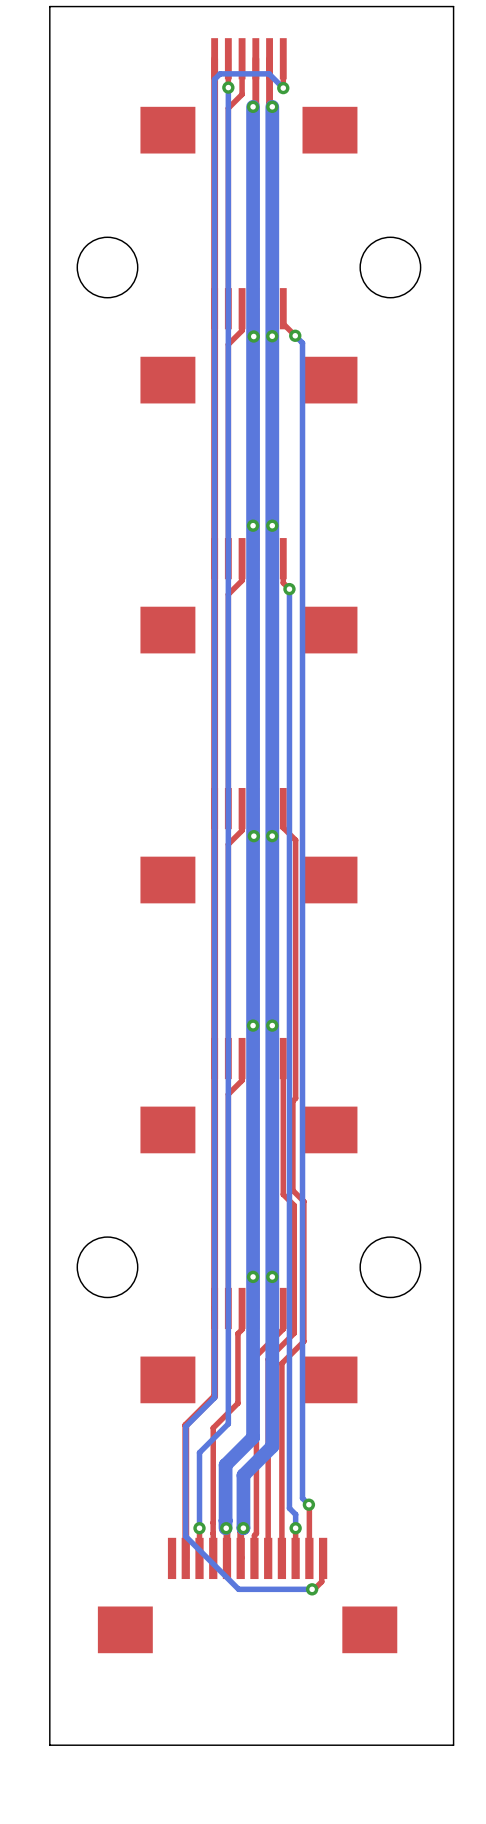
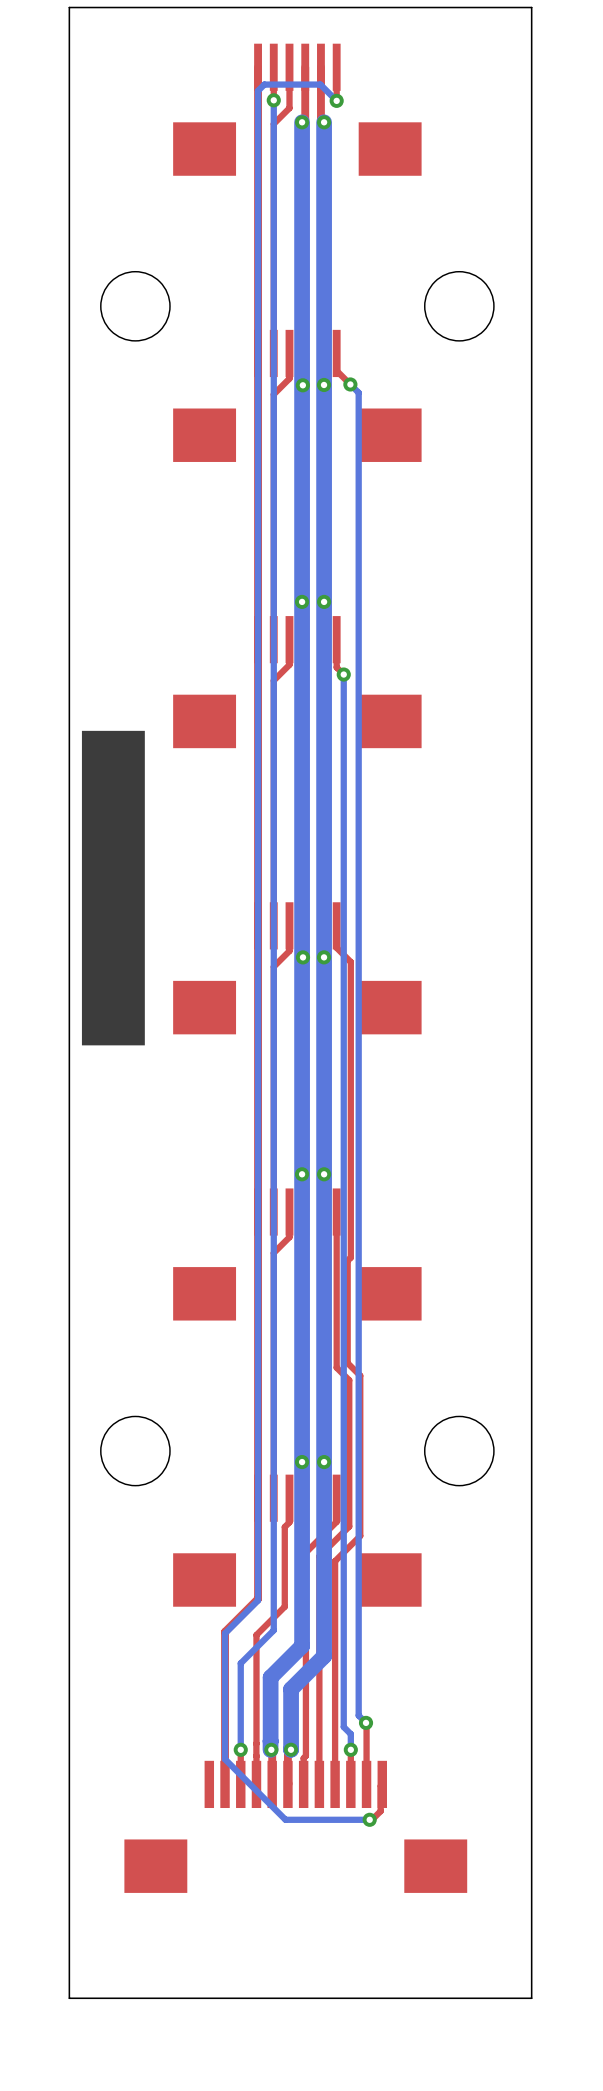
drawing: none -> [81, 730, 145, 1046]

